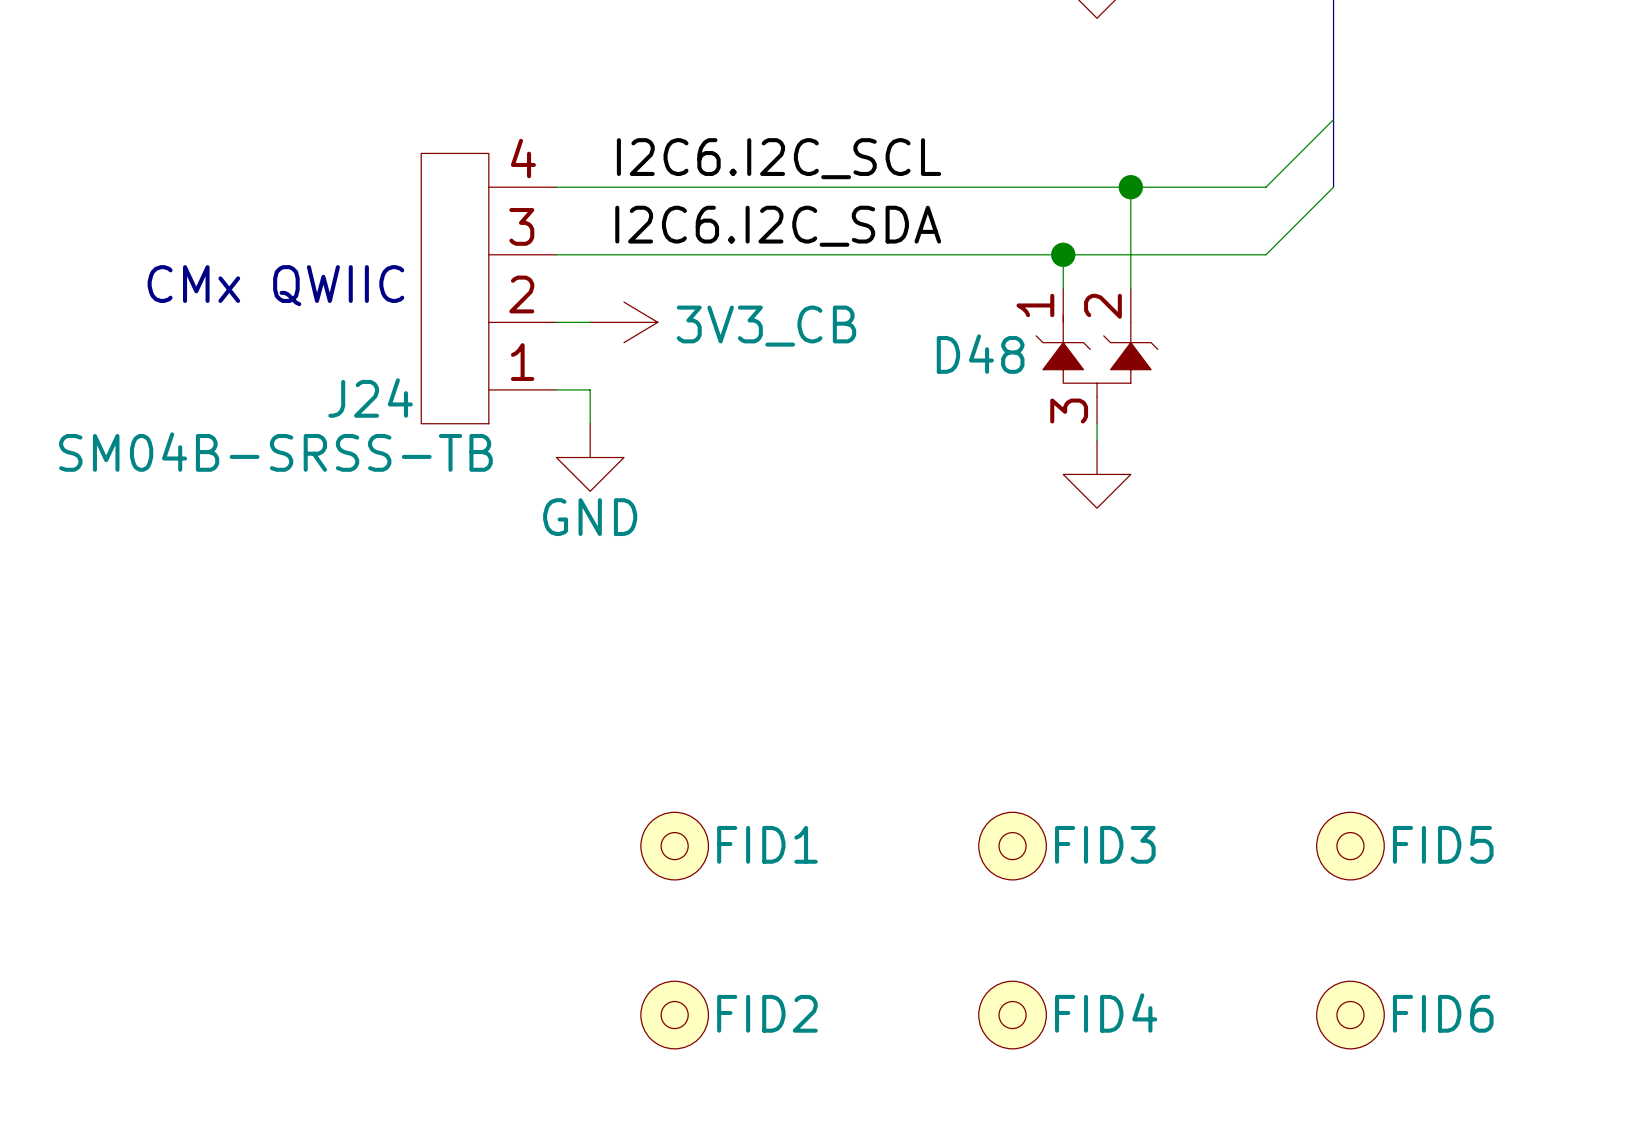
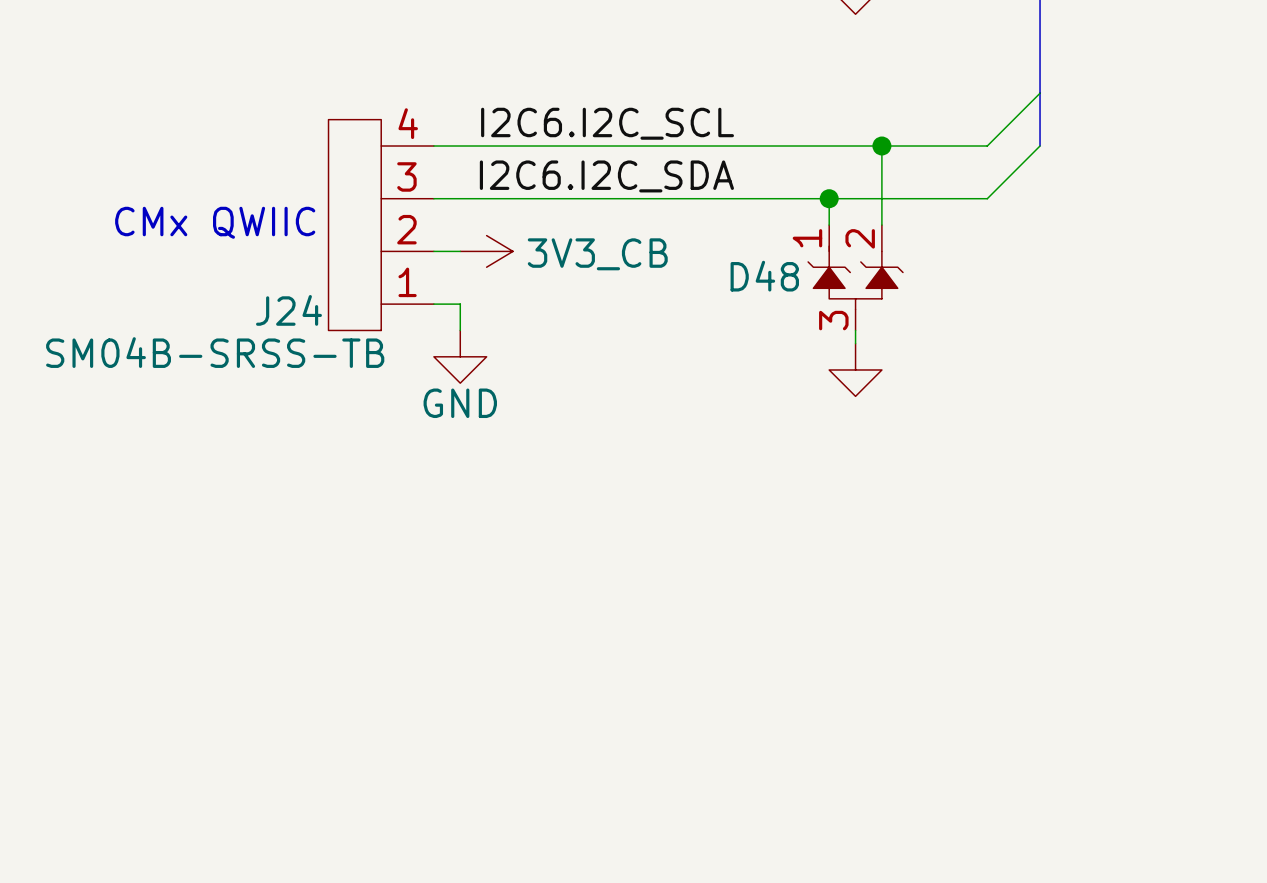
FID1: (674, 846) -> none
FID3: (1012, 846) -> none
FID5: (1350, 846) -> none
FID2: (674, 1015) -> none
FID4: (1012, 1015) -> none
FID6: (1350, 1015) -> none

